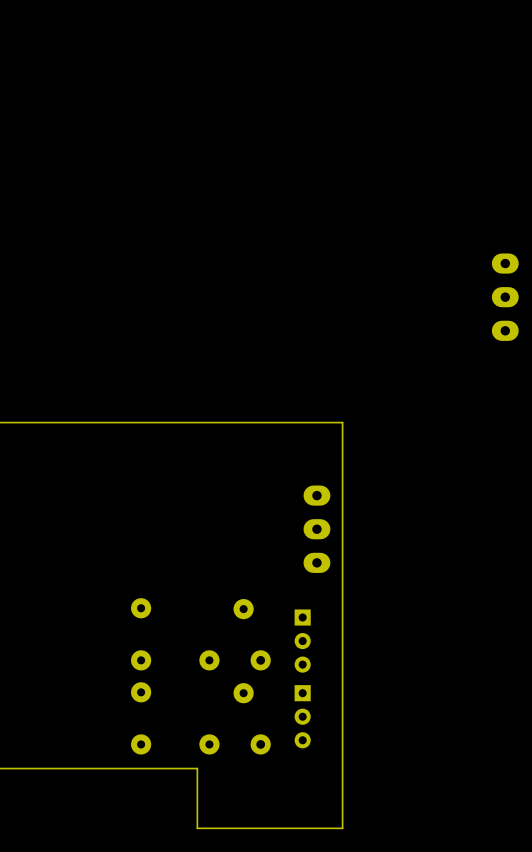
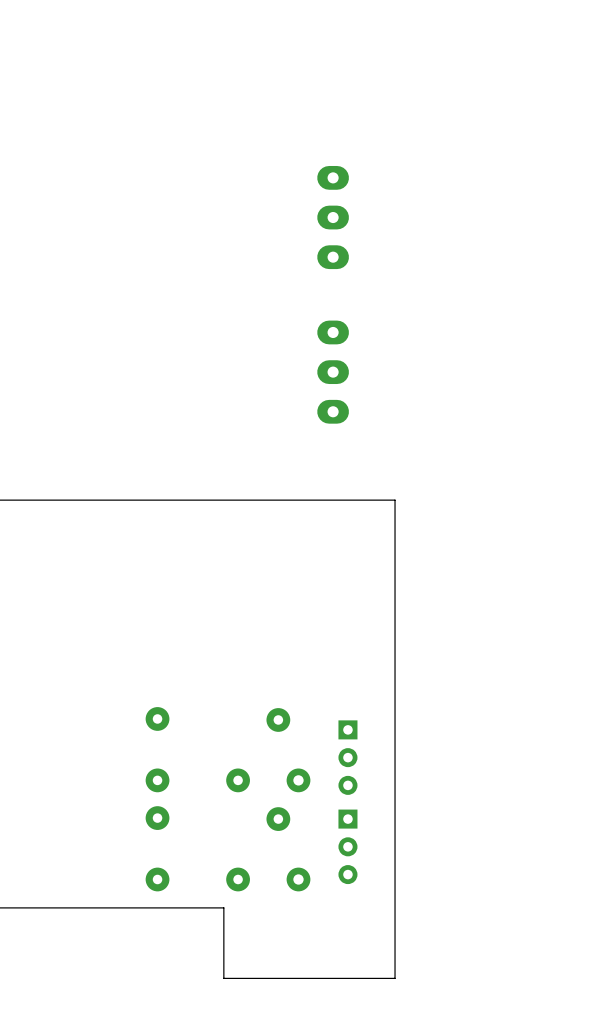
part: none -> (333, 217)
part: (505, 297) -> none
part: none -> (333, 372)
part: (316, 529) -> none

